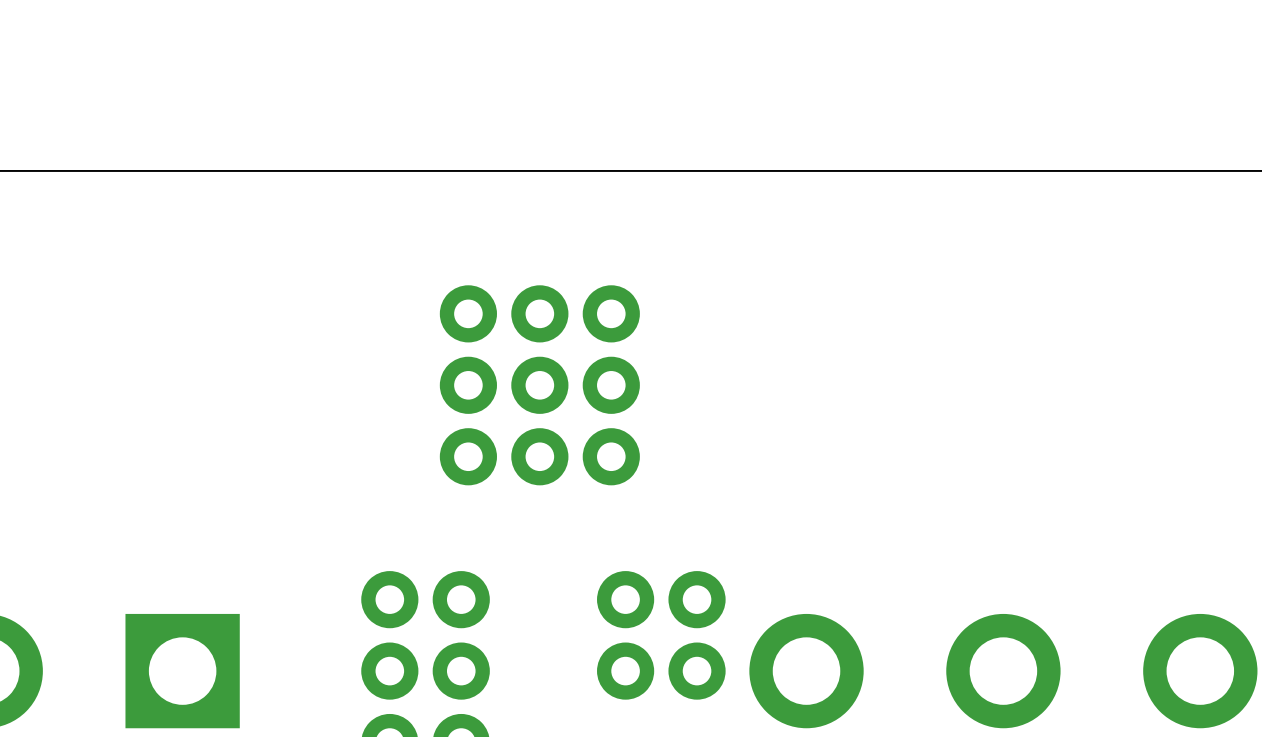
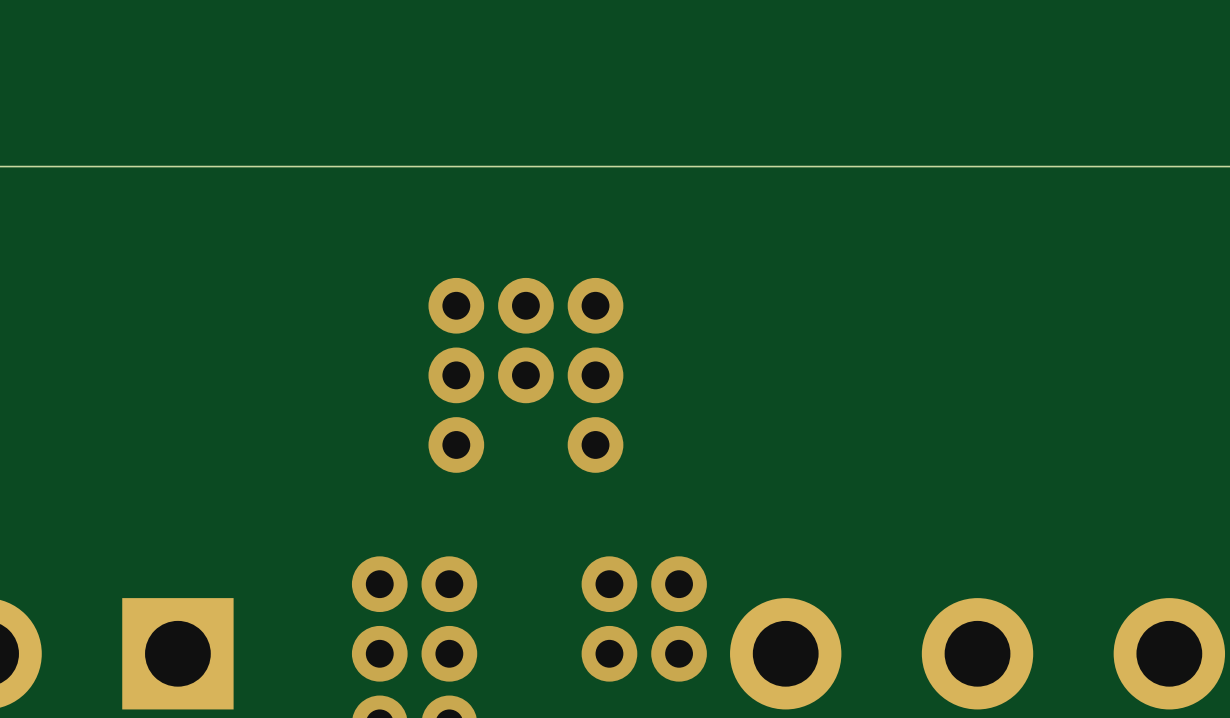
via: (539, 456) -> none

